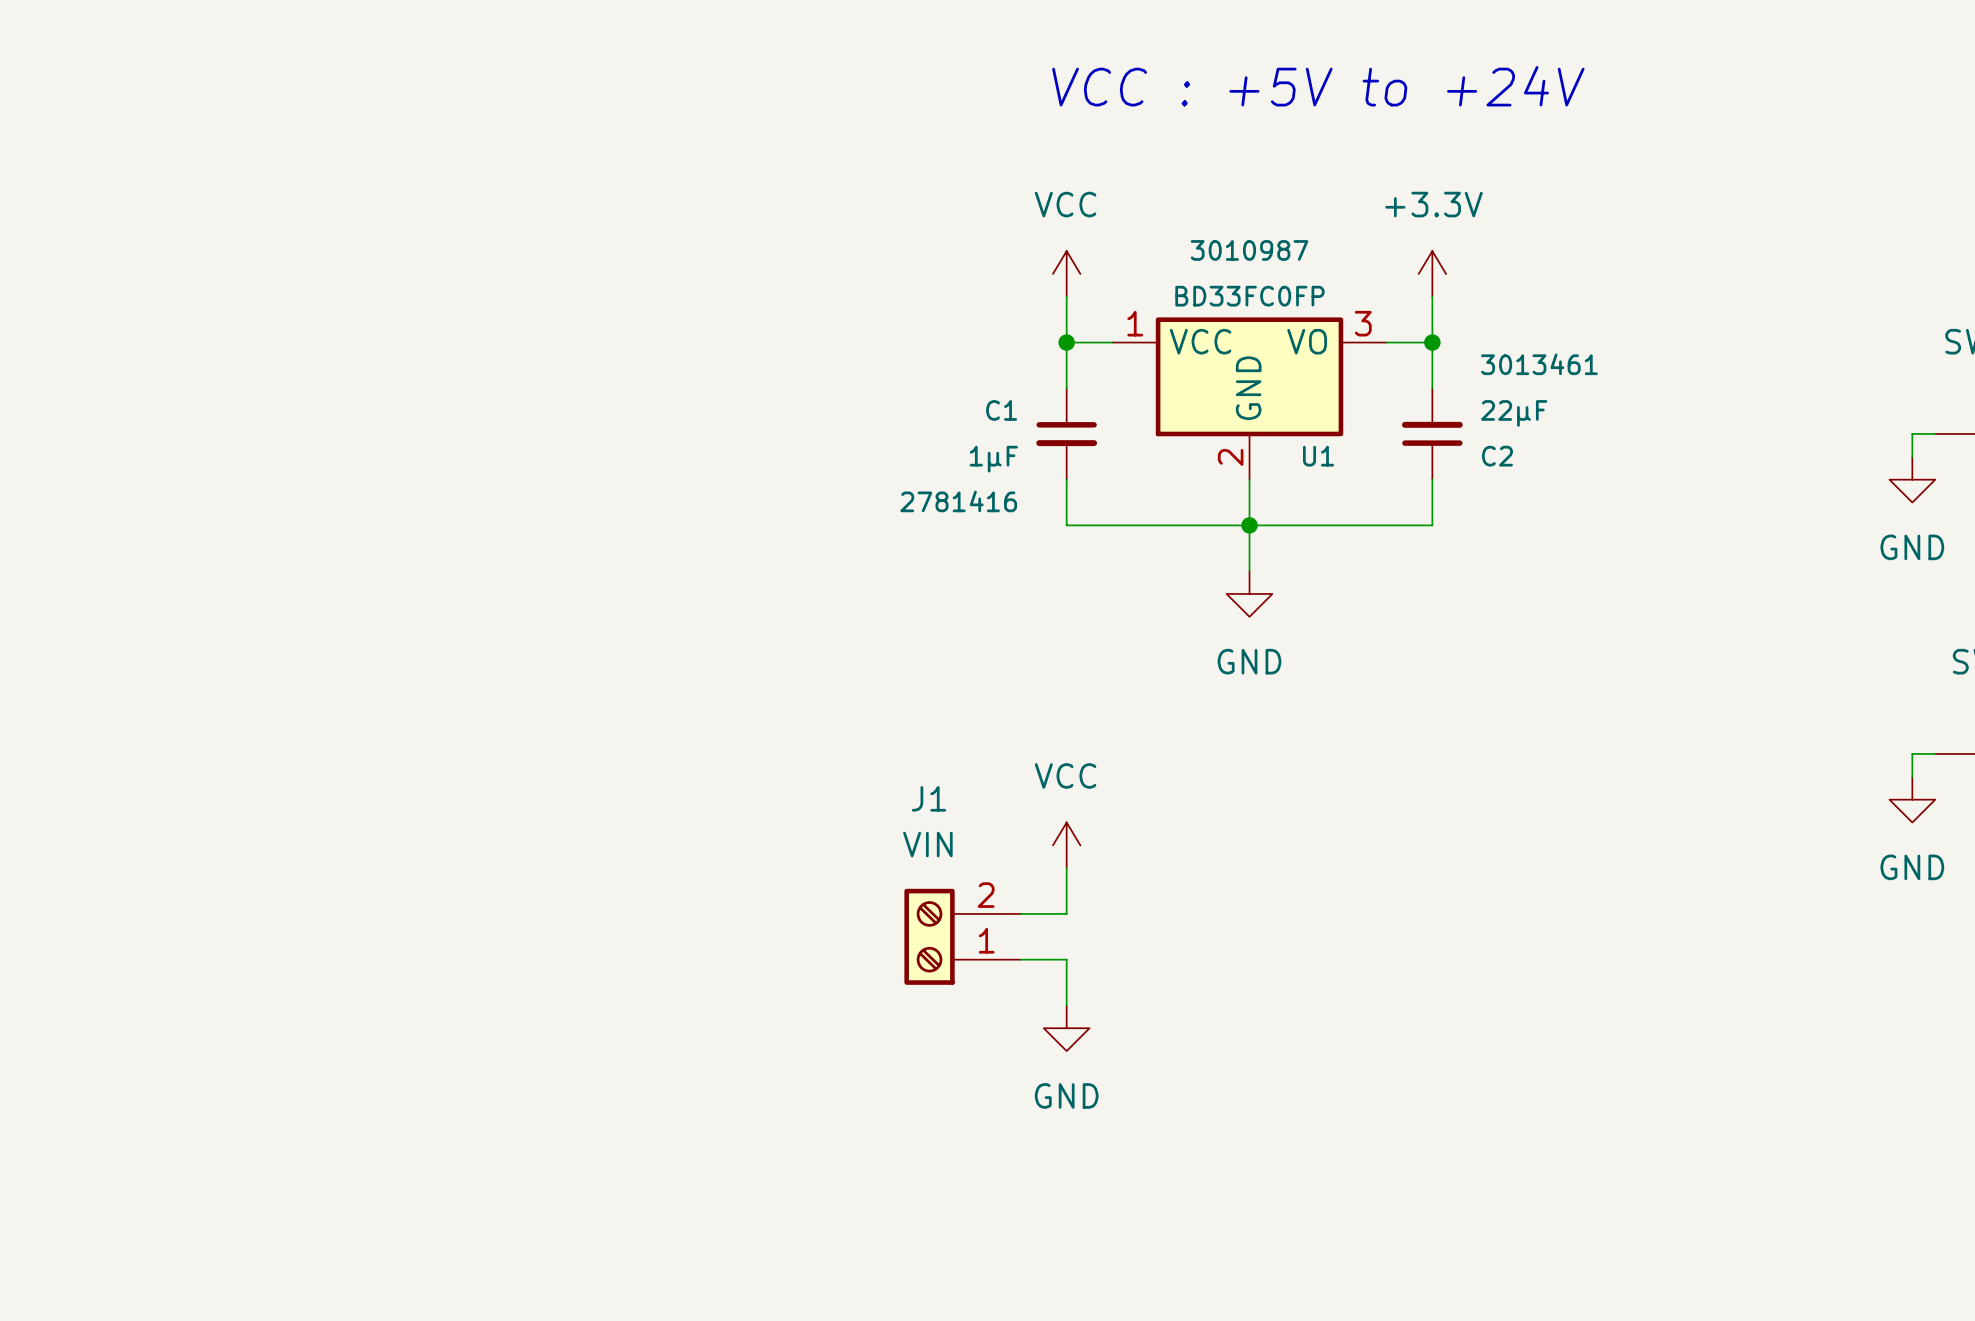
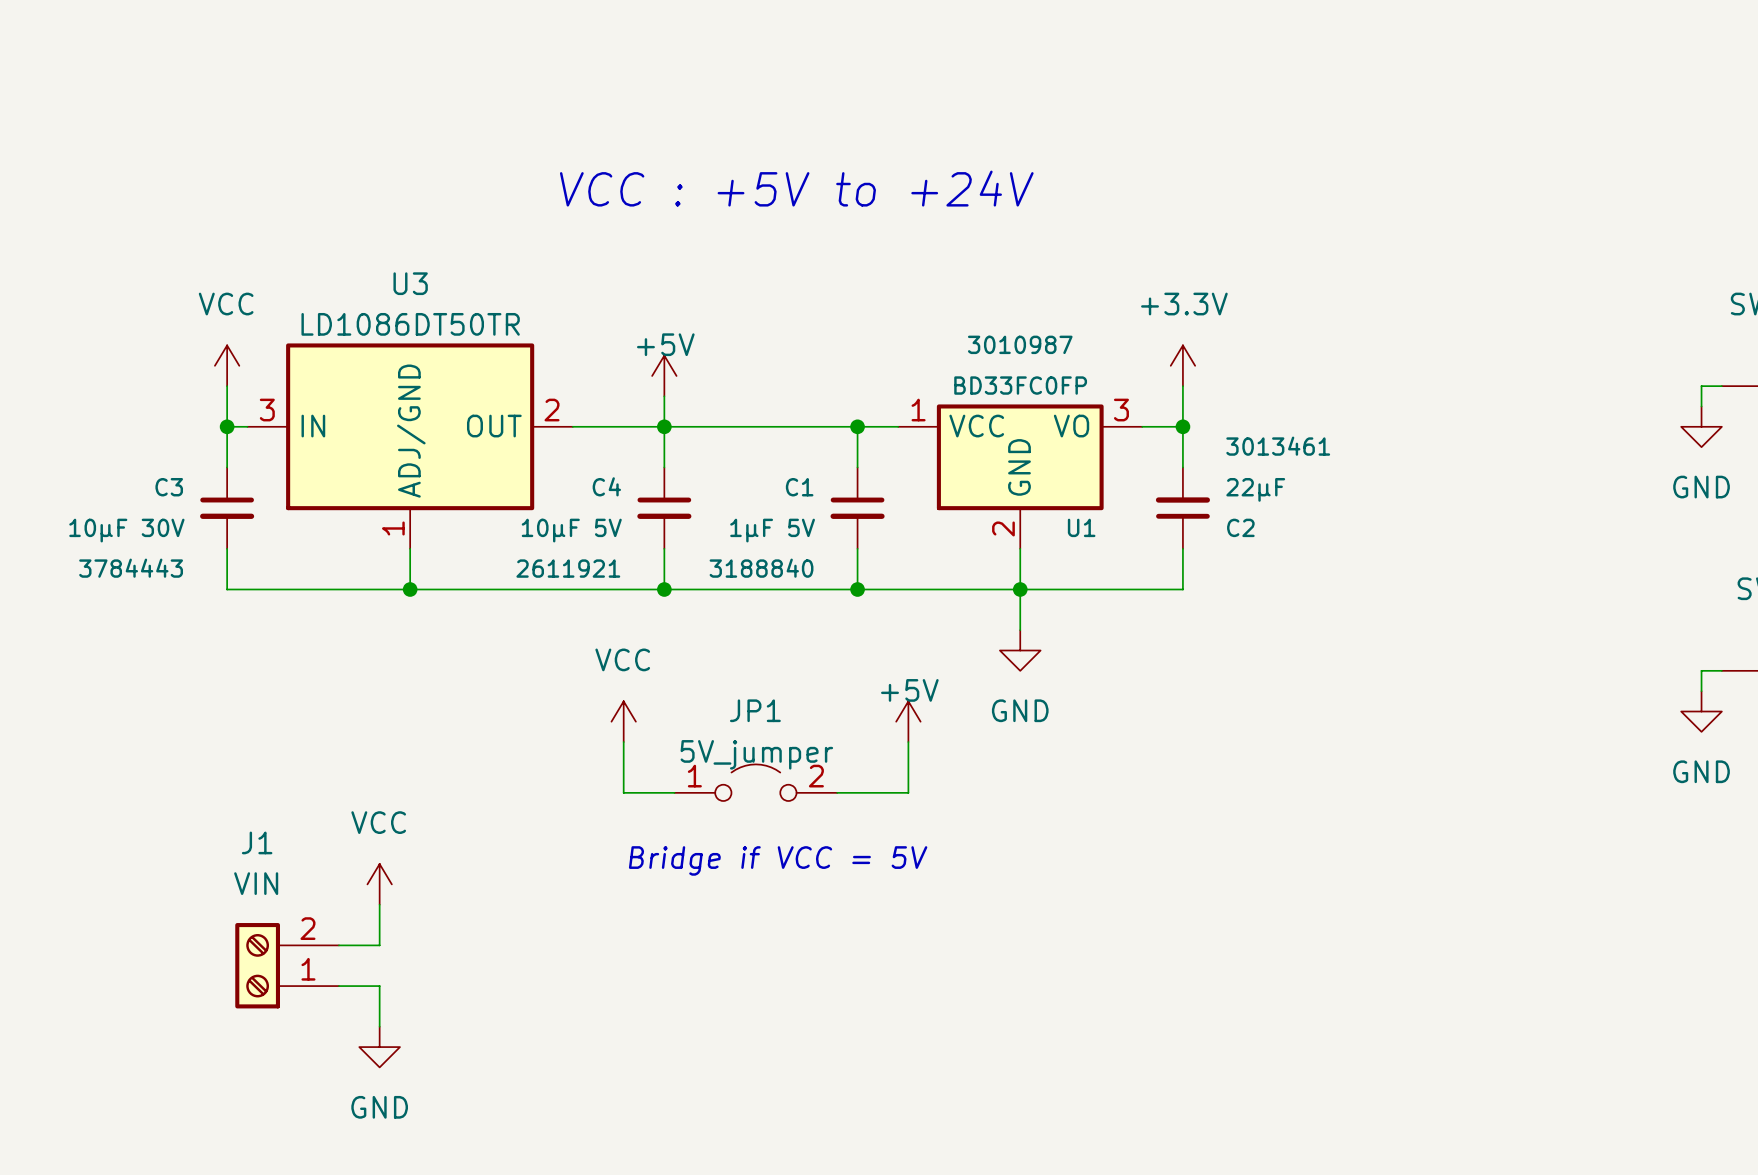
text position: VCC : +5V to +24V (1318, 86) -> VCC : +5V to +24V (796, 188)
power symbol: VCC (1066, 273) -> none
power symbol position: +3.3V (1432, 273) -> +3.3V (1182, 365)
wire: (1066, 296) (1066, 388) -> none
wire: (1432, 296) (1432, 388) -> (1182, 386) (1182, 467)
wire: (1066, 342) (1112, 342) -> none
junction: (1066, 342) -> none
wire: (1386, 342) (1432, 342) -> (1142, 426) (1182, 426)
junction: (1432, 342) -> none
U1 position: (1249, 398) -> (1020, 476)
power symbol: none -> VCC (227, 365)
power symbol: none -> +5V (664, 375)
wire: none -> (227, 386) (227, 467)
C1 position: (1066, 433) -> (857, 508)
C2 position: (1432, 433) -> (1182, 508)
wire: none -> (664, 396) (664, 467)
C1 value: 1µF (993, 459) -> 1µF 5V (772, 530)
wire: none -> (227, 426) (247, 426)
junction: none -> (227, 426)
wire: none -> (572, 426) (898, 426)
junction: none -> (664, 426)
wire: none -> (857, 426) (857, 467)
junction: none -> (857, 426)
wire: (1066, 479) (1066, 525) (1432, 525) (1432, 479) -> none
wire: (1249, 479) (1249, 571) -> (1020, 548) (1020, 630)
junction: none -> (1182, 426)
U3: none -> LD1086DT50TR (410, 446)
C1 text: 2781416 (958, 501) -> 3188840 (761, 568)
junction: (1249, 525) -> none
C3: none -> 10µF 30V (227, 508)
C4: none -> 10µF 5V (664, 508)
power symbol: GND (1249, 593) -> none
wire: none -> (227, 548) (227, 589) (1182, 589) (1182, 548)
wire: none -> (410, 548) (410, 589)
wire: none -> (664, 548) (664, 589)
wire: none -> (857, 548) (857, 589)
junction: none -> (410, 589)
junction: none -> (664, 589)
junction: none -> (857, 589)
junction: none -> (1020, 589)
power symbol: none -> GND (1020, 650)
power symbol: none -> VCC (623, 721)
power symbol: none -> +5V (908, 721)
wire: none -> (623, 742) (623, 792) (674, 792)
wire: none -> (908, 742) (908, 792) (837, 792)
power symbol: VCC (1066, 845) -> none
wire: (1066, 868) (1066, 913) (1020, 913) -> none
JP1: none -> 5V_jumper (755, 782)
J1 position: (962, 936) -> (287, 965)
wire: (1020, 959) (1066, 959) (1066, 1005) -> none
text: none -> Bridge if VCC = 5V (778, 860)
power symbol: none -> VCC (379, 884)
wire: none -> (379, 904) (379, 945) (338, 945)
power symbol: GND (1066, 1028) -> none
wire: none -> (338, 986) (379, 986) (379, 1026)
power symbol: none -> GND (379, 1047)

